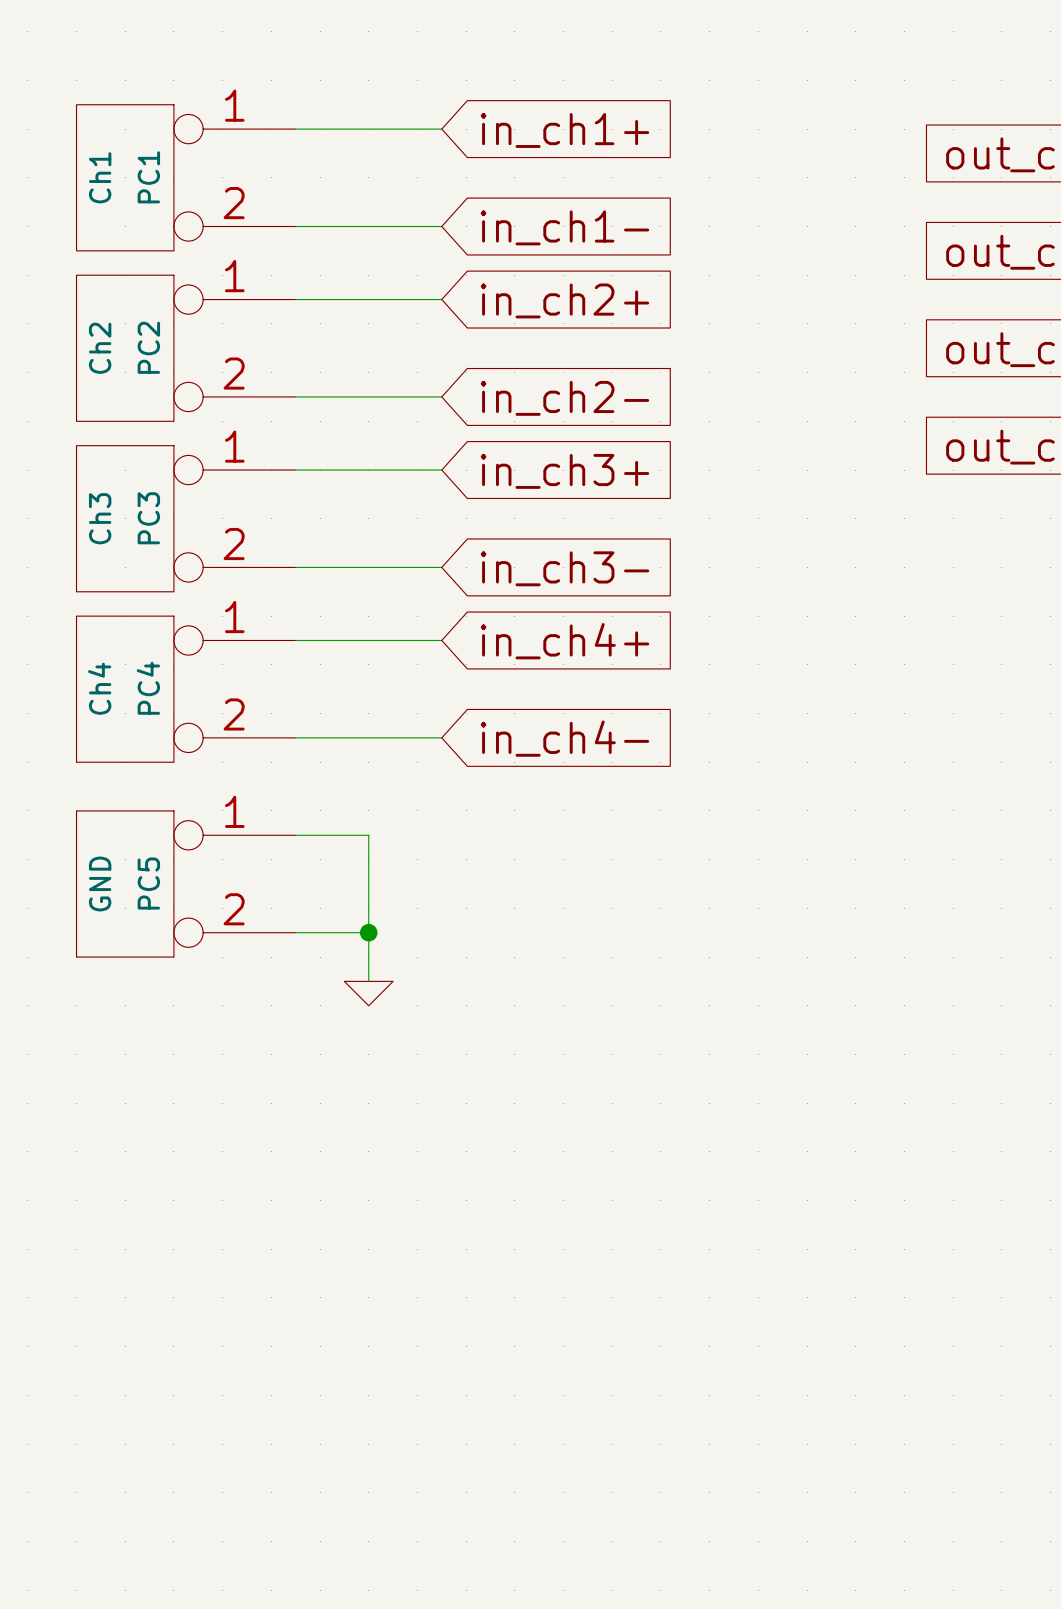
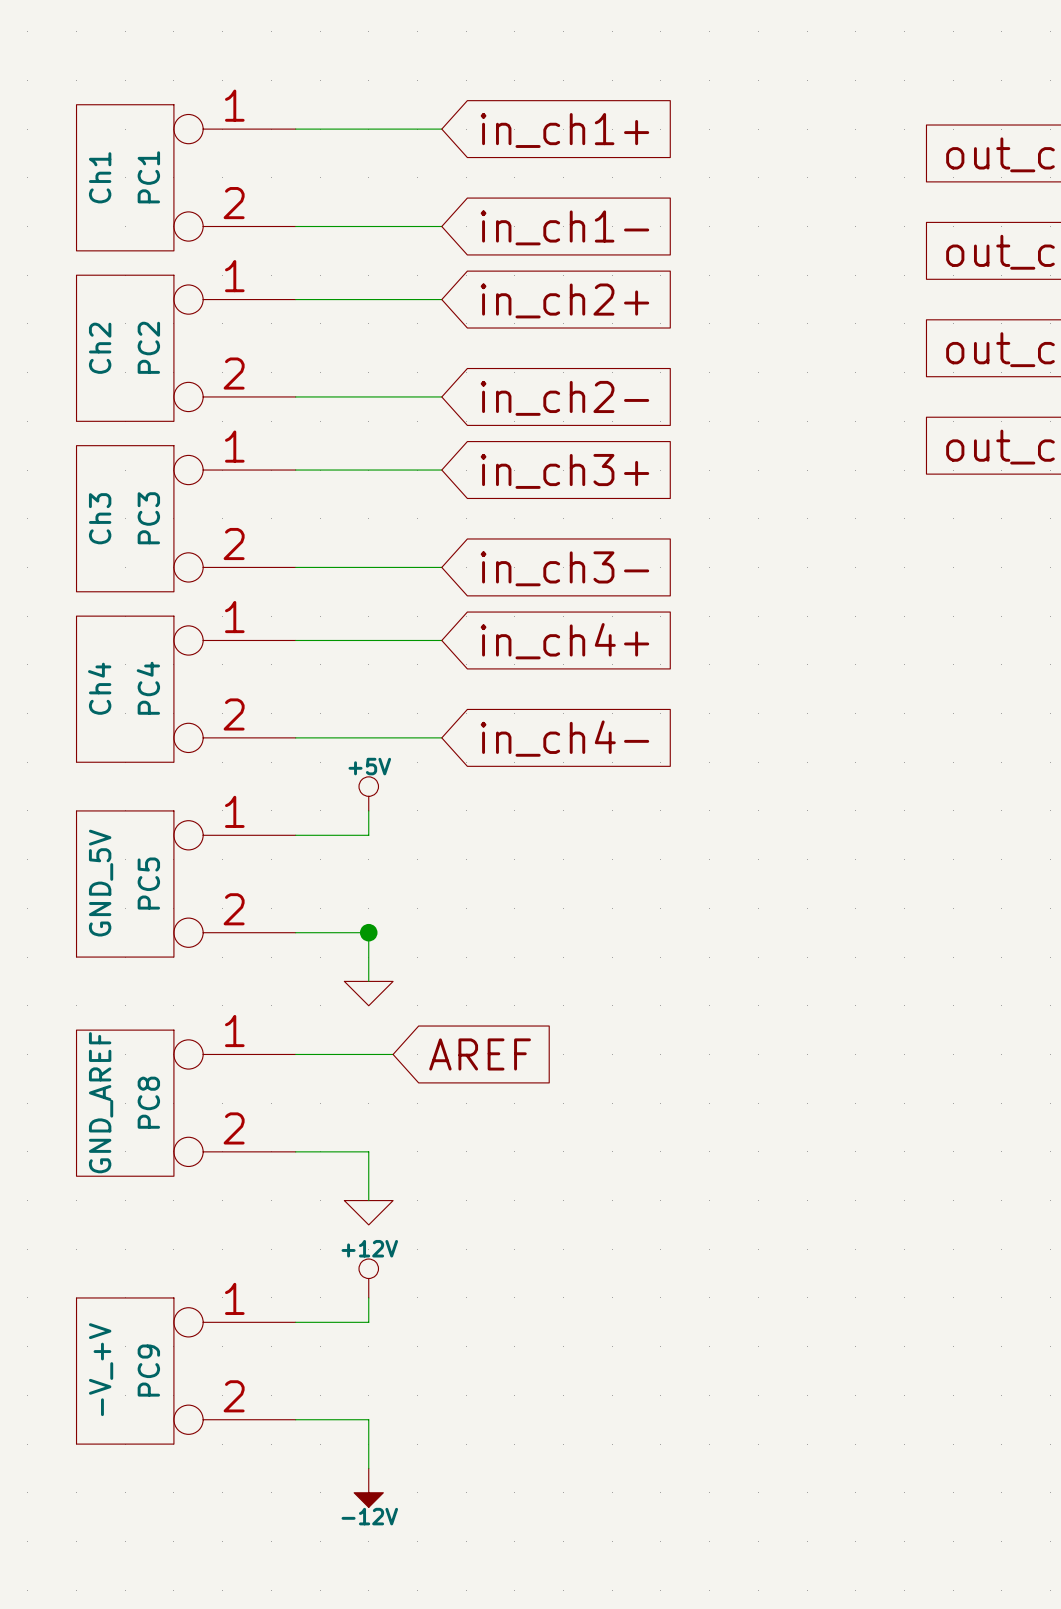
power symbol: none -> +5V (368, 793)
wire: (368, 835) (368, 932) -> (368, 835) (368, 810)
PC5 value: GND (100, 884) -> GND_5V (101, 883)
wire: none -> (295, 1054) (393, 1054)
global label: none -> AREF (480, 1054)
PC8: none -> GND_AREF (186, 1103)
wire: none -> (295, 1151) (368, 1151) (368, 1200)
power symbol: none -> (368, 1212)
power symbol: none -> +12V (368, 1278)
wire: none -> (368, 1297) (368, 1322) (295, 1322)
PC9: none -> -V_+V (186, 1371)
wire: none -> (295, 1419) (368, 1419) (368, 1468)
power symbol: none -> -12V (368, 1487)

